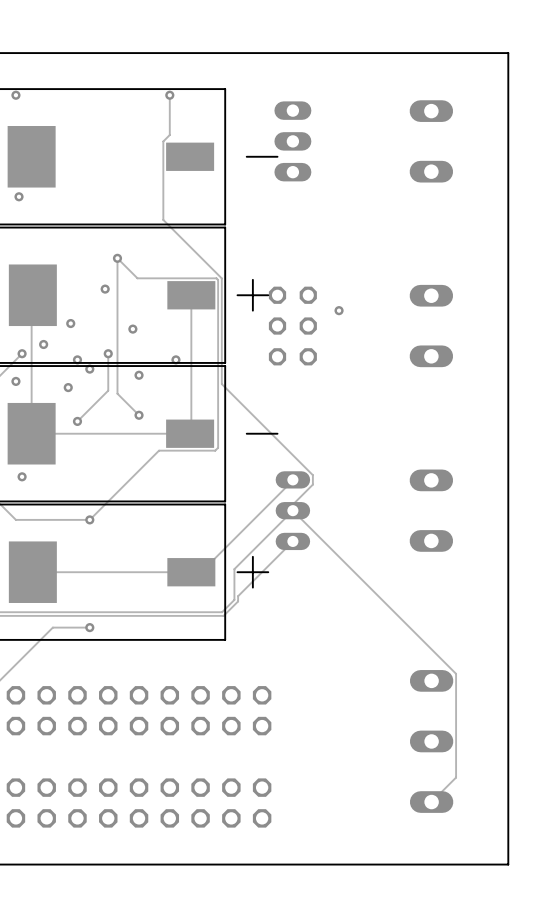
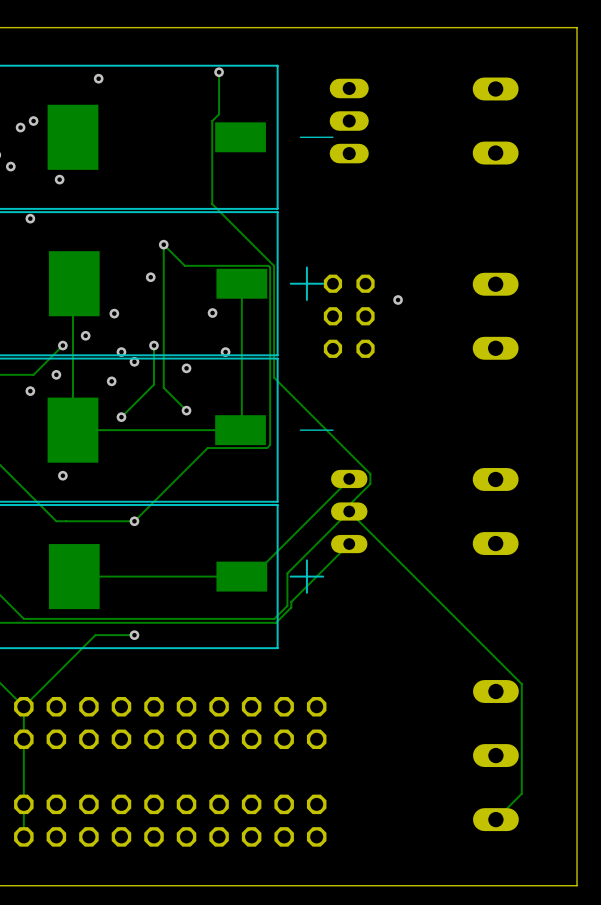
via position: (15, 95) -> (98, 78)
via position: (132, 329) -> (212, 313)

